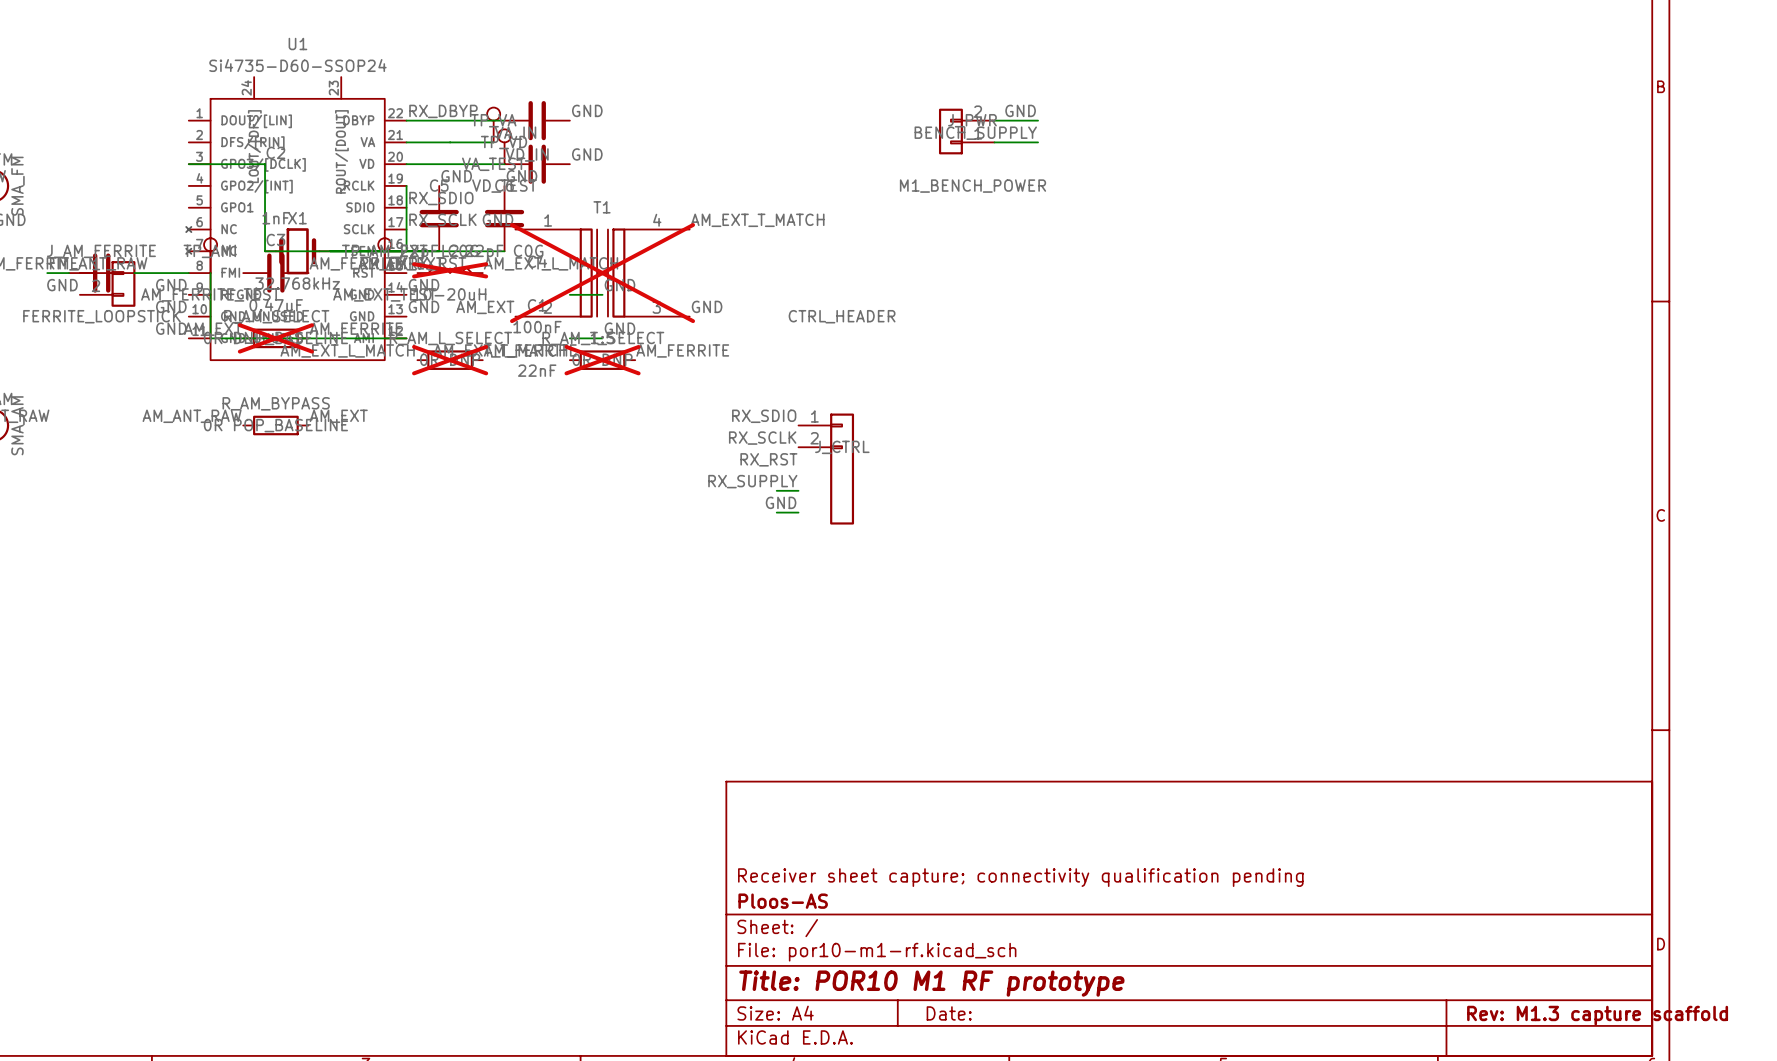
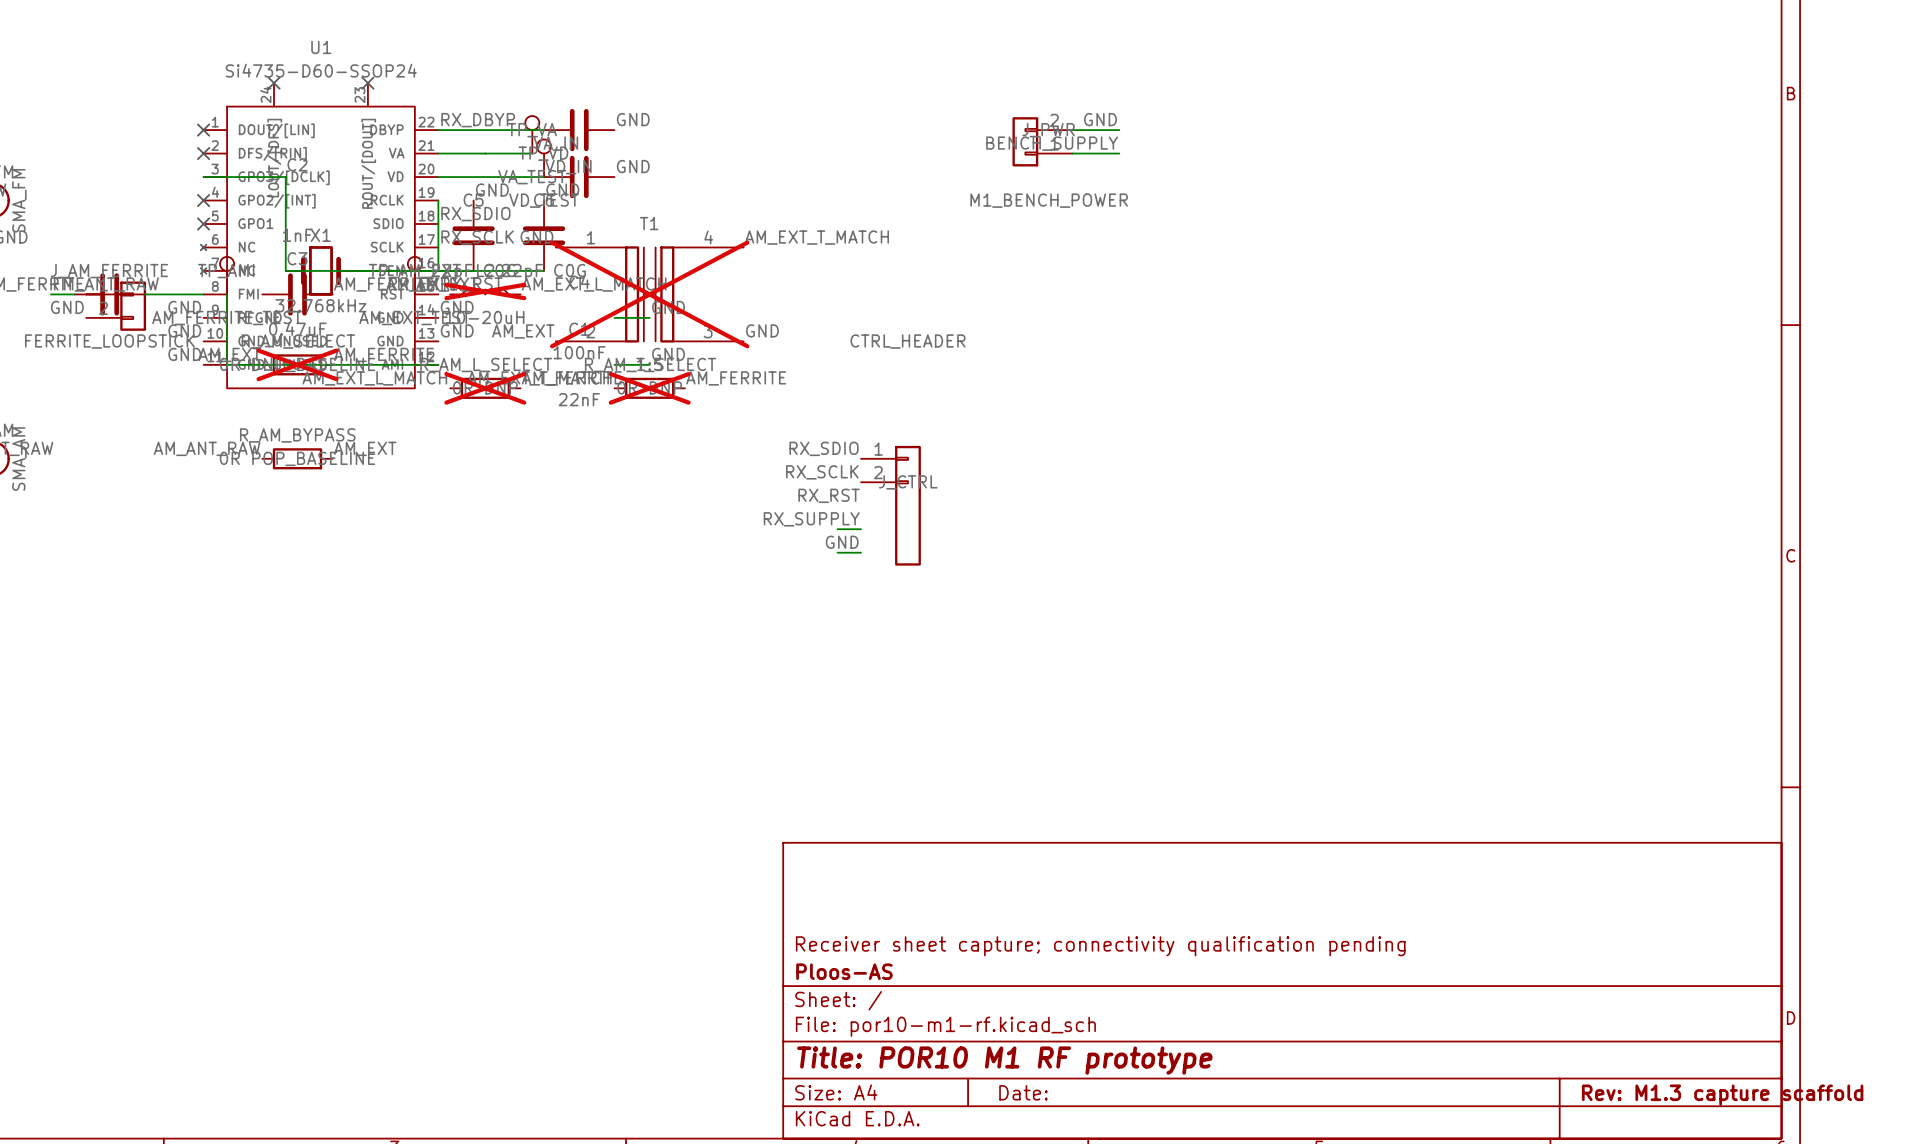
no-connect mark: none -> (274, 83)
no-connect mark: none -> (367, 83)
no-connect mark: none -> (203, 130)
no-connect mark: none -> (203, 153)
no-connect mark: none -> (203, 200)
no-connect mark: none -> (203, 223)

